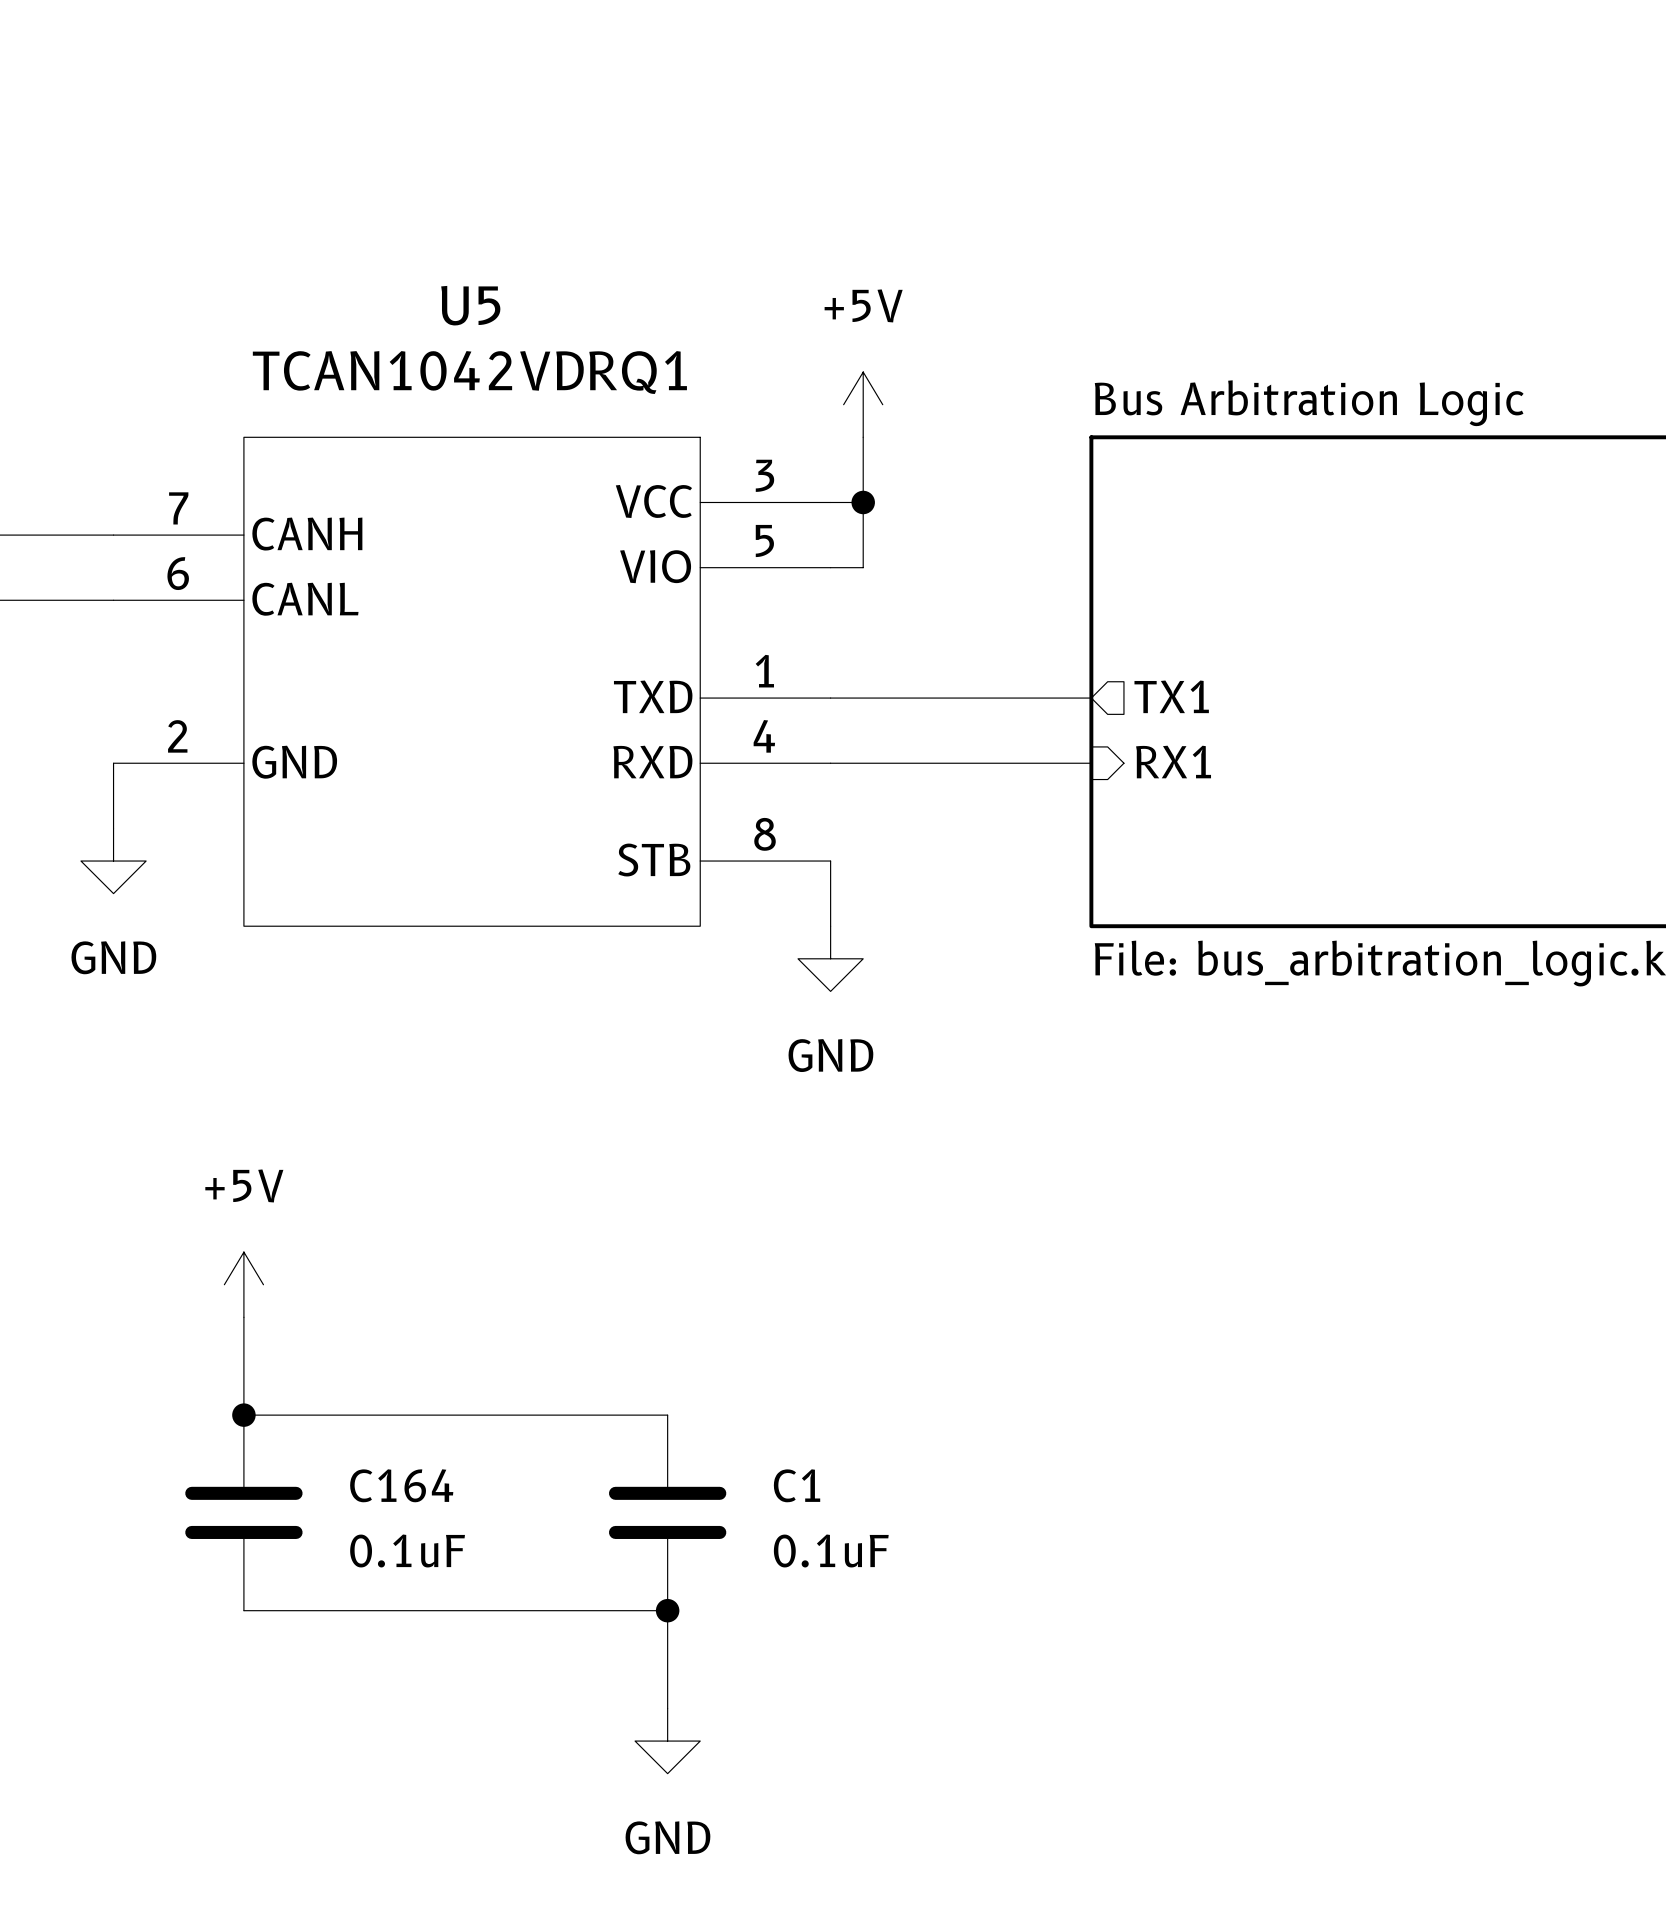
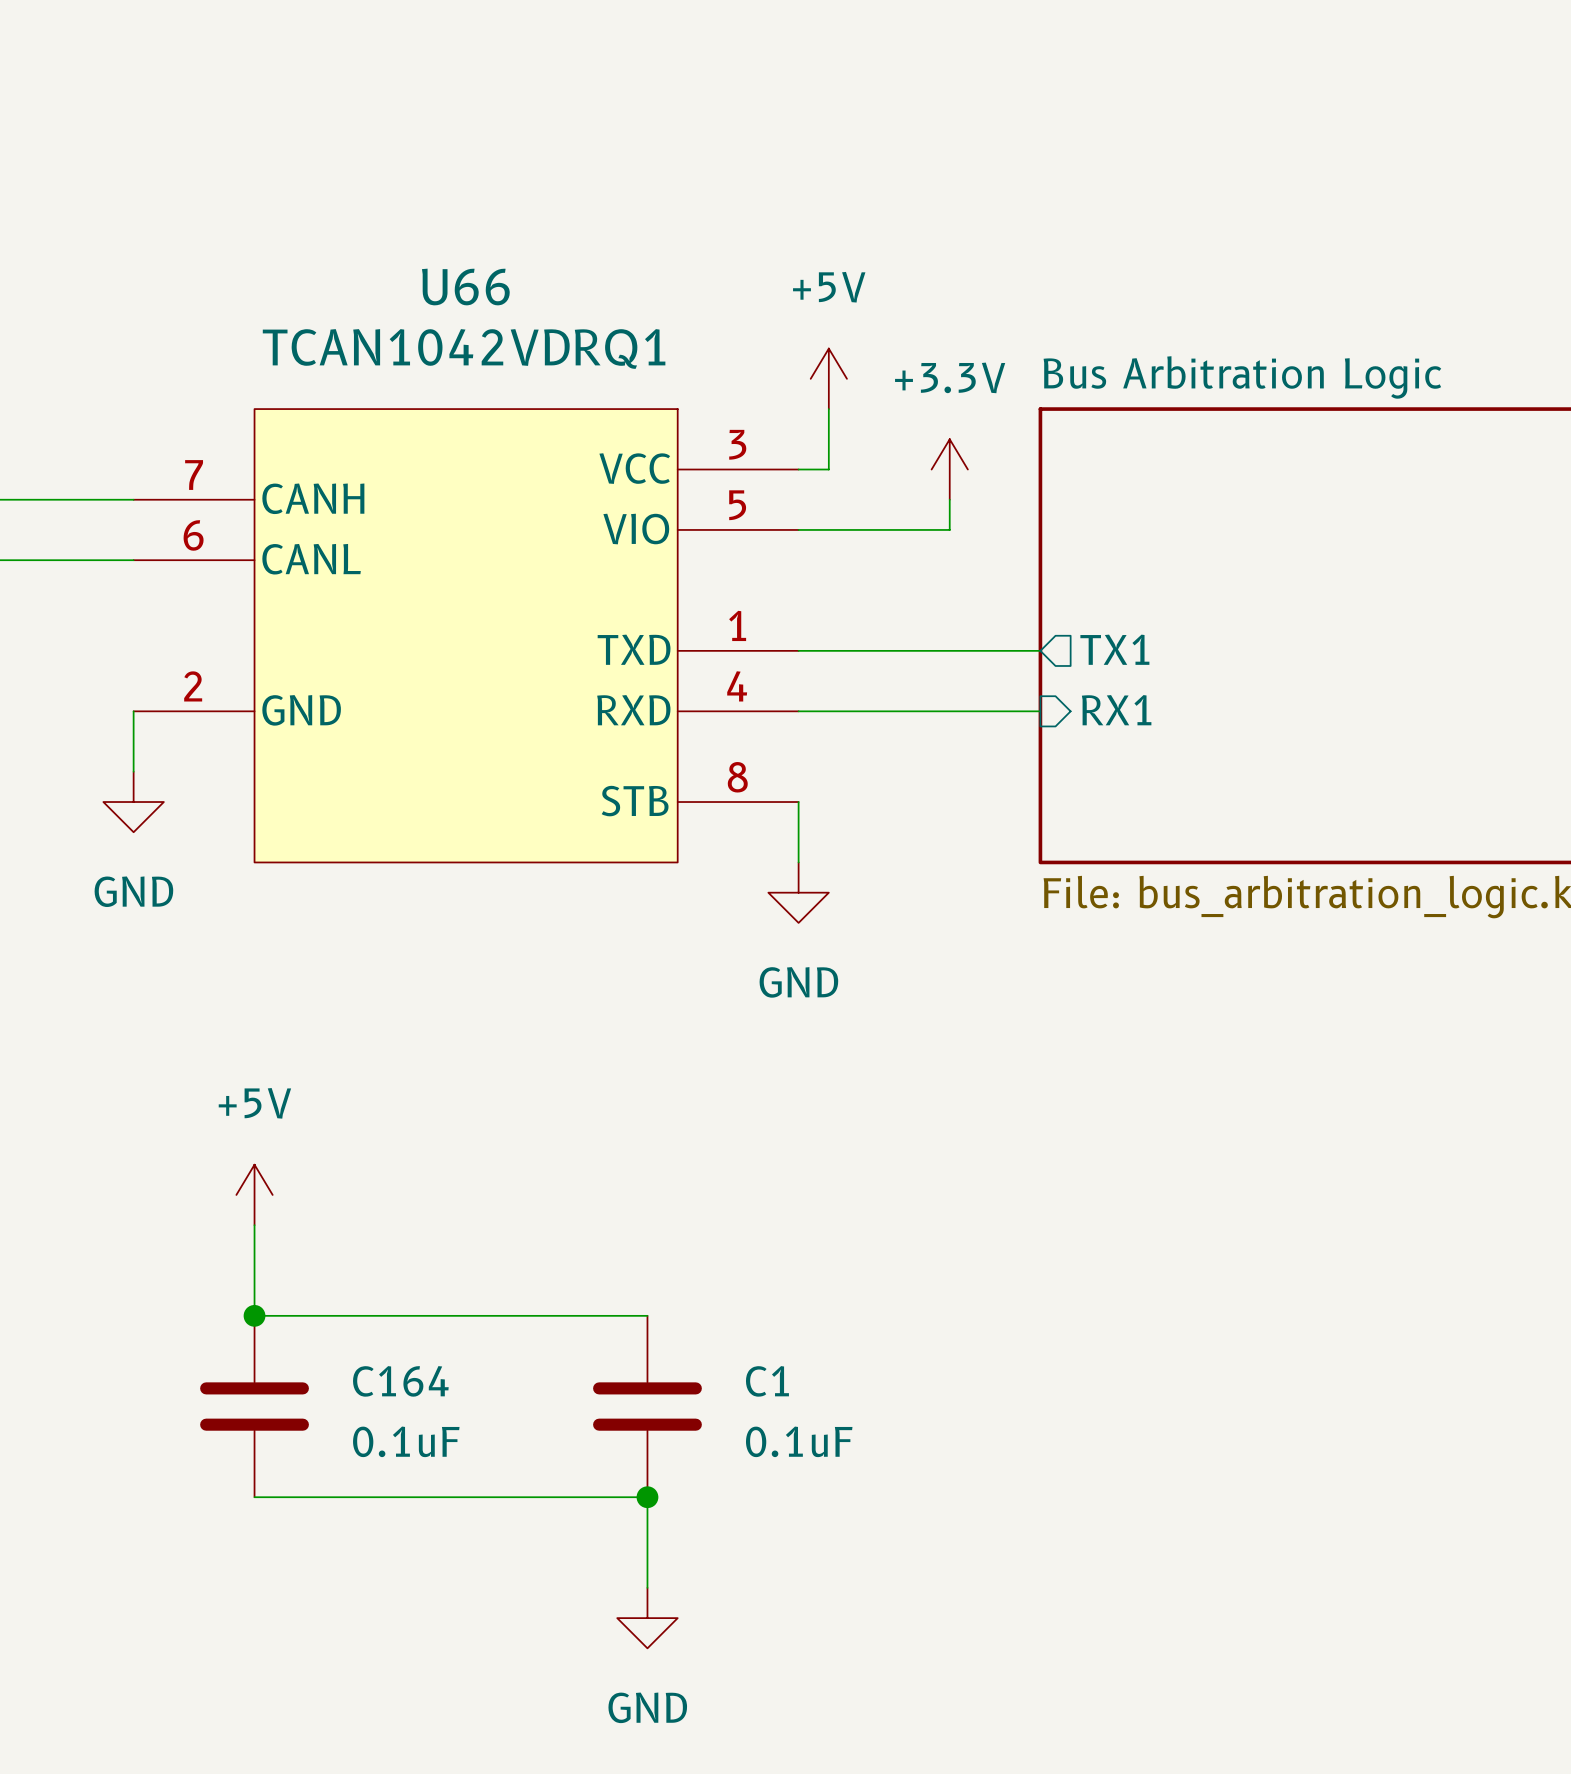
U5 name: U5 (470, 305) -> U66 (465, 287)
wire: (863, 502) (863, 567) -> (949, 499) (949, 529) (828, 529)
junction: (863, 502) -> none
power symbol: none -> +3.3V (949, 469)

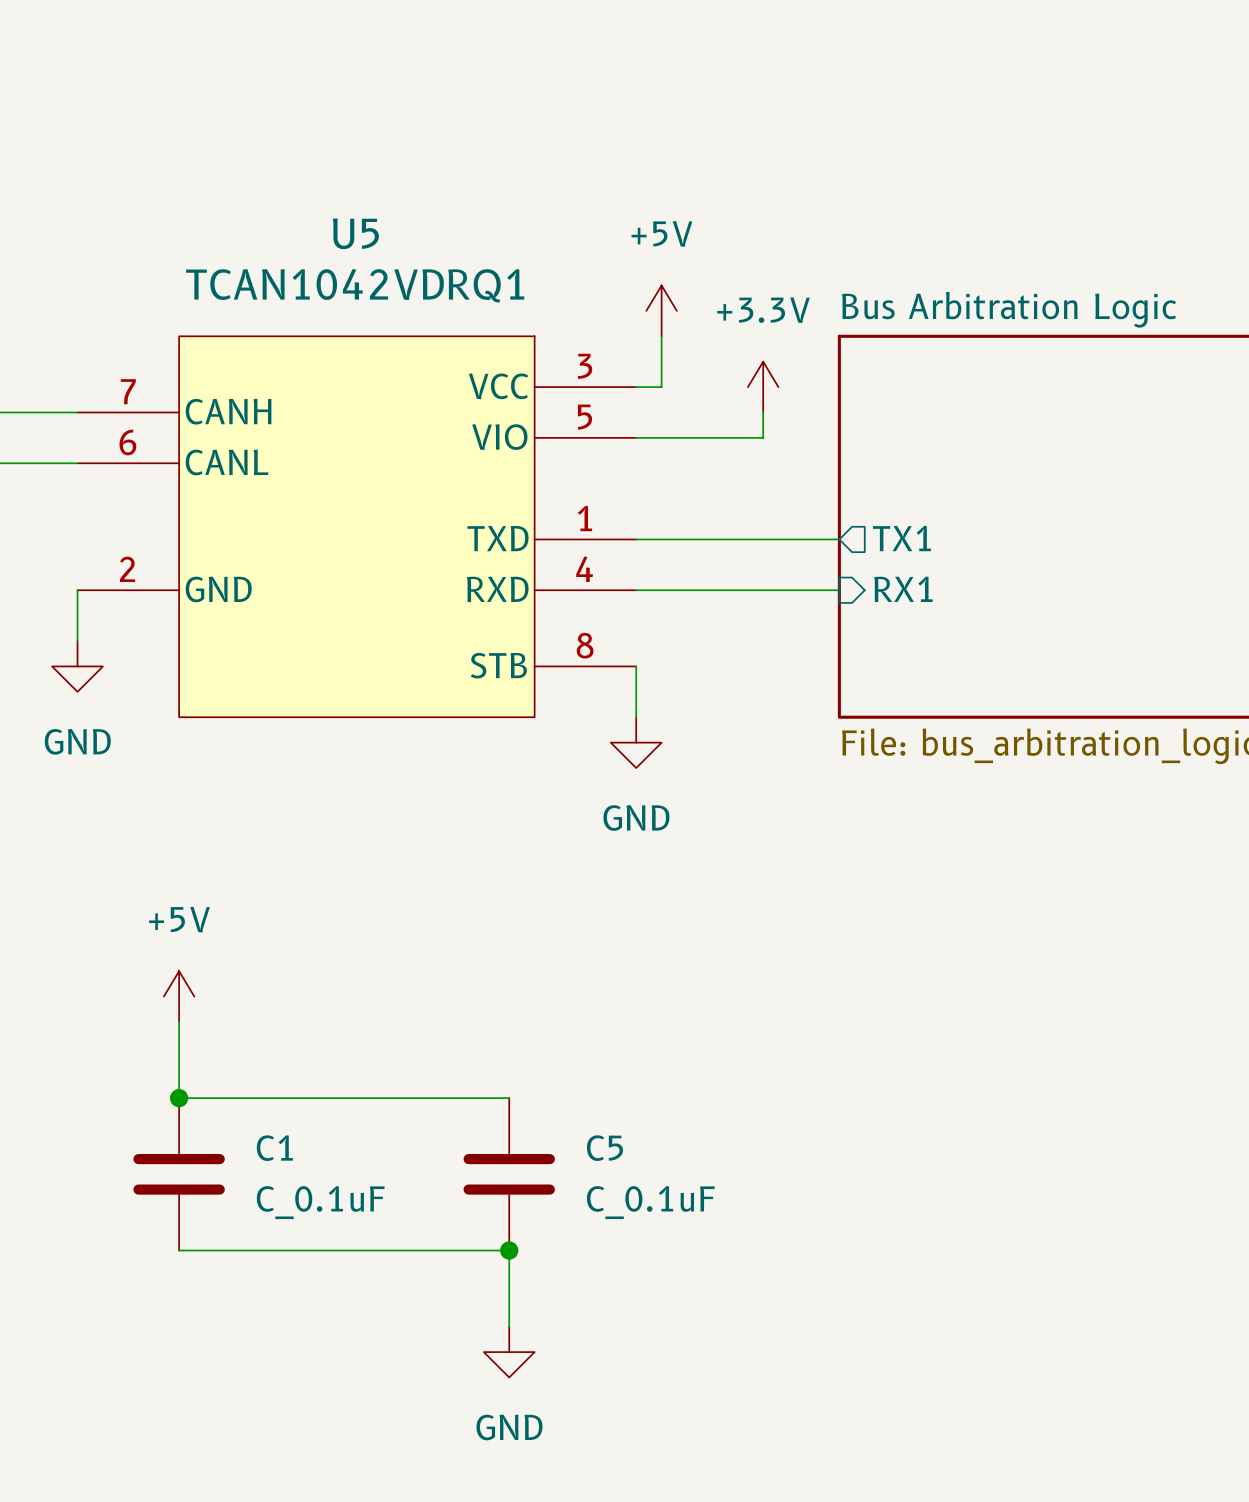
U66 name: U66 (465, 287) -> U5 (355, 233)
C164 name: C164 (400, 1381) -> C1 (274, 1148)
C1 name: C1 (767, 1381) -> C5 (604, 1148)
C164 value: 0.1uF (406, 1441) -> C_0.1uF (320, 1202)
C1 value: 0.1uF (799, 1441) -> C_0.1uF (650, 1202)

